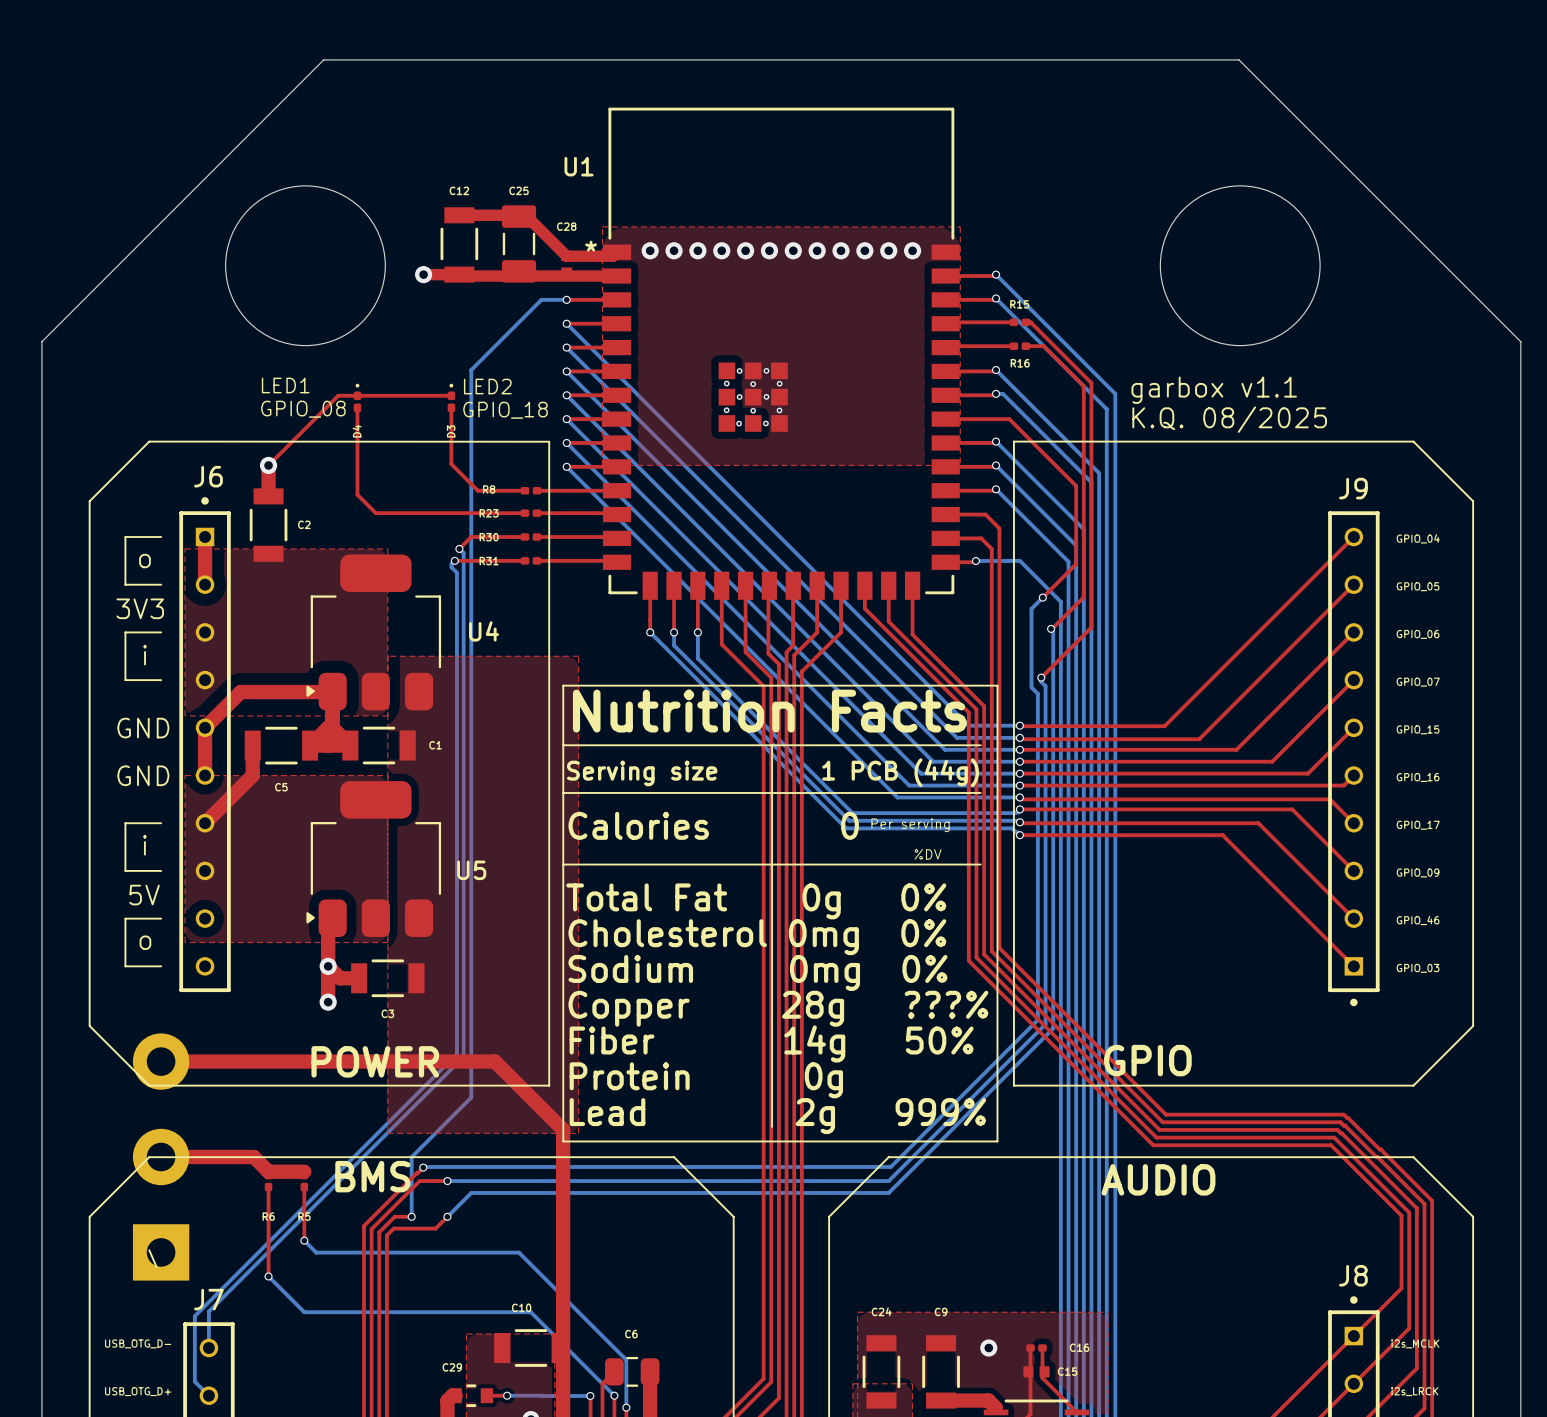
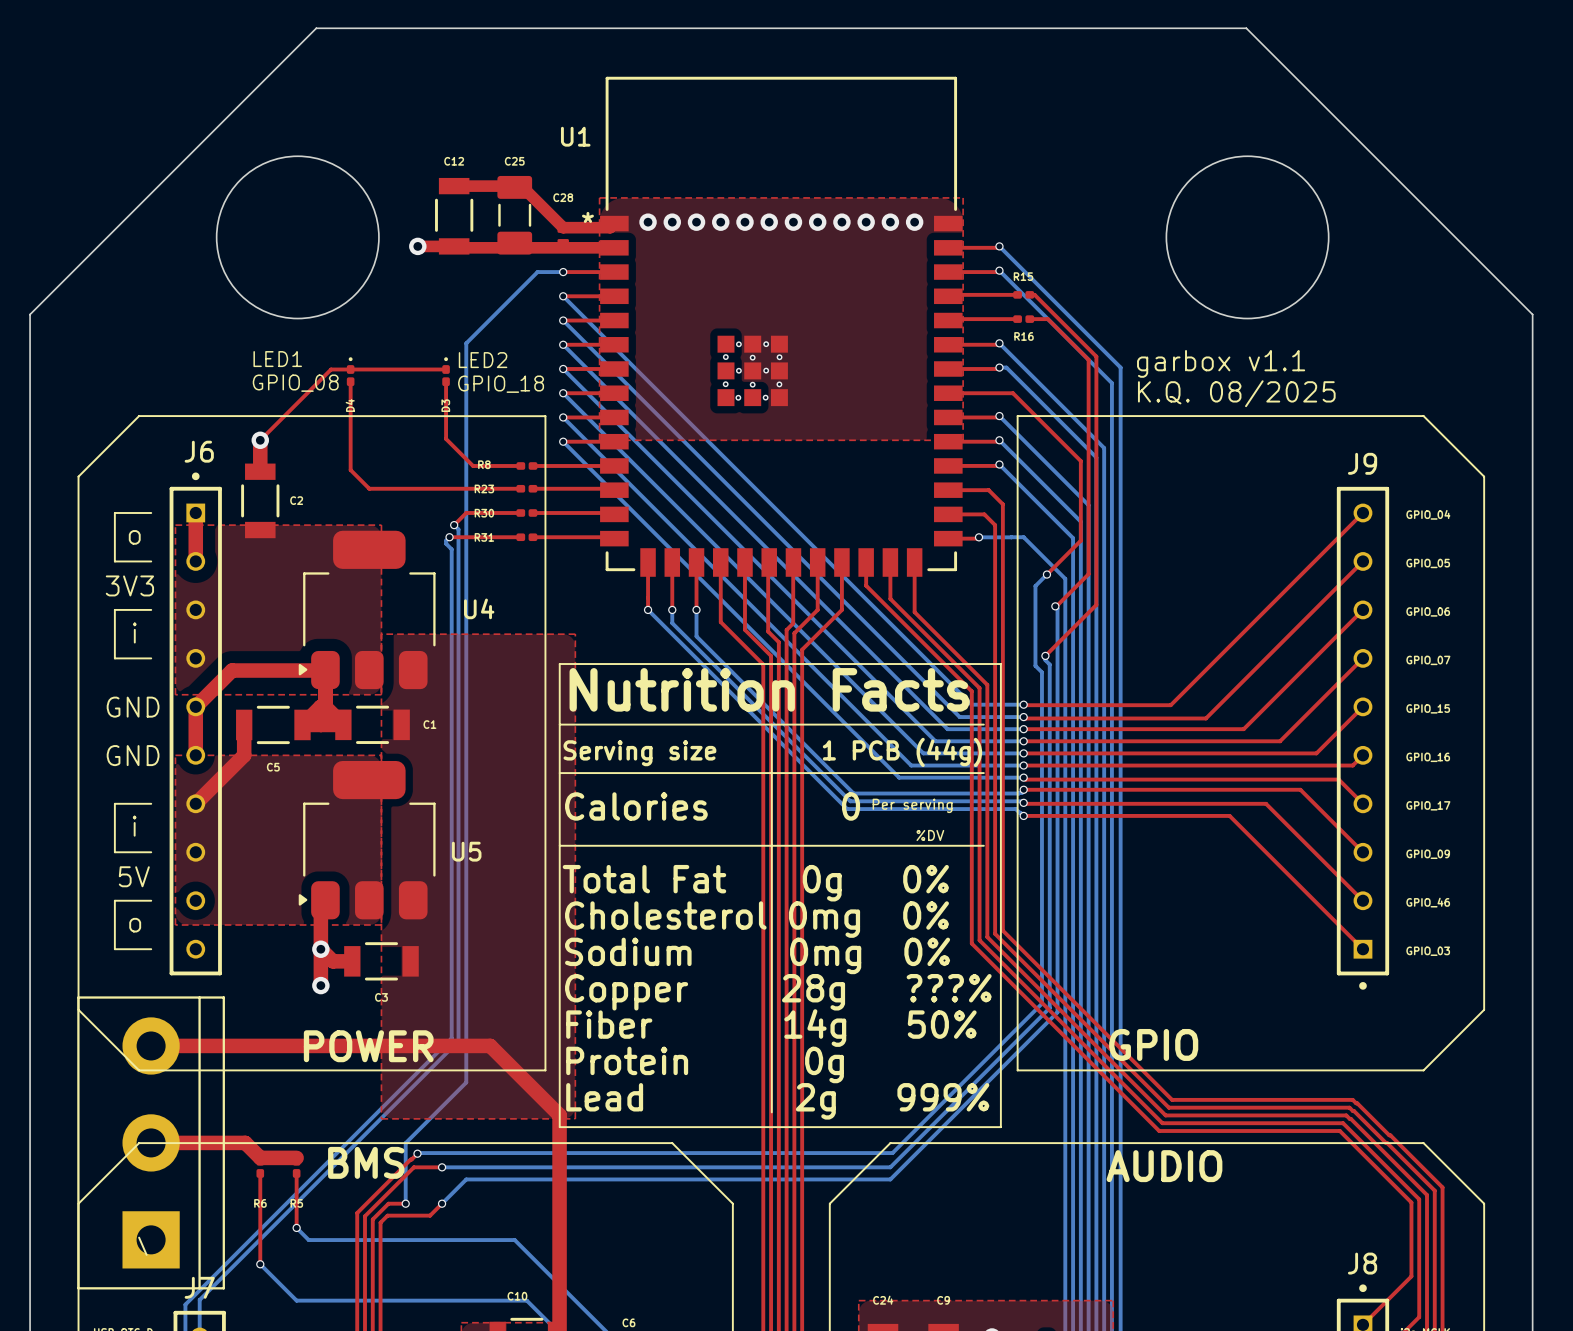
part footprint: [132, 1033, 190, 1281] -> [77, 996, 225, 1290]

